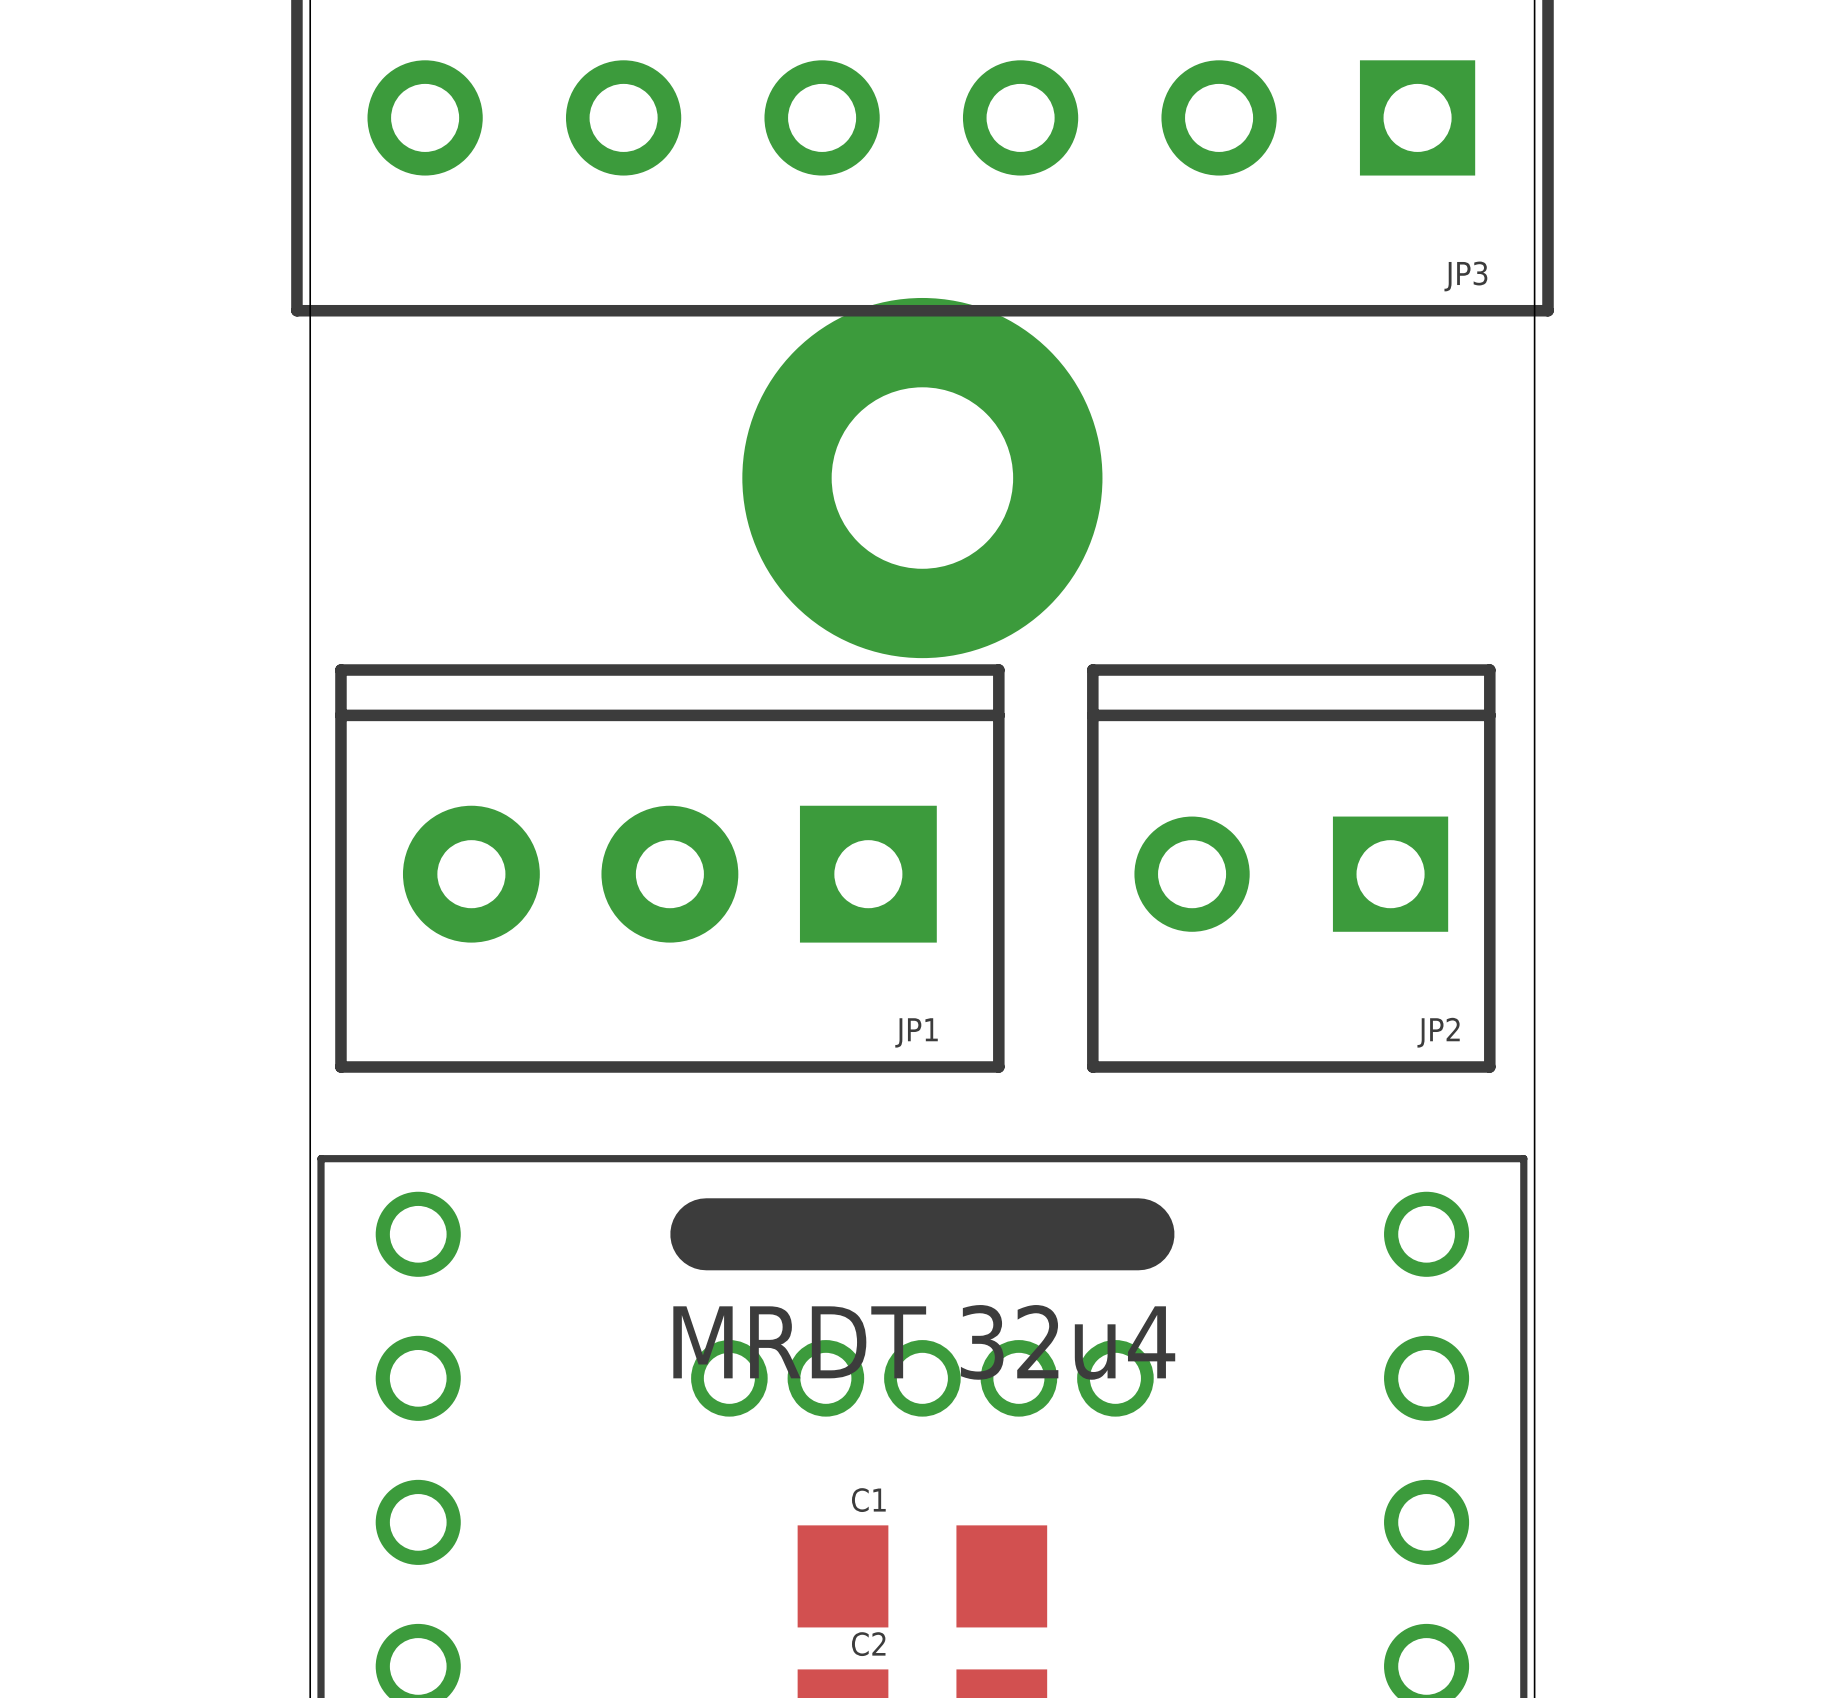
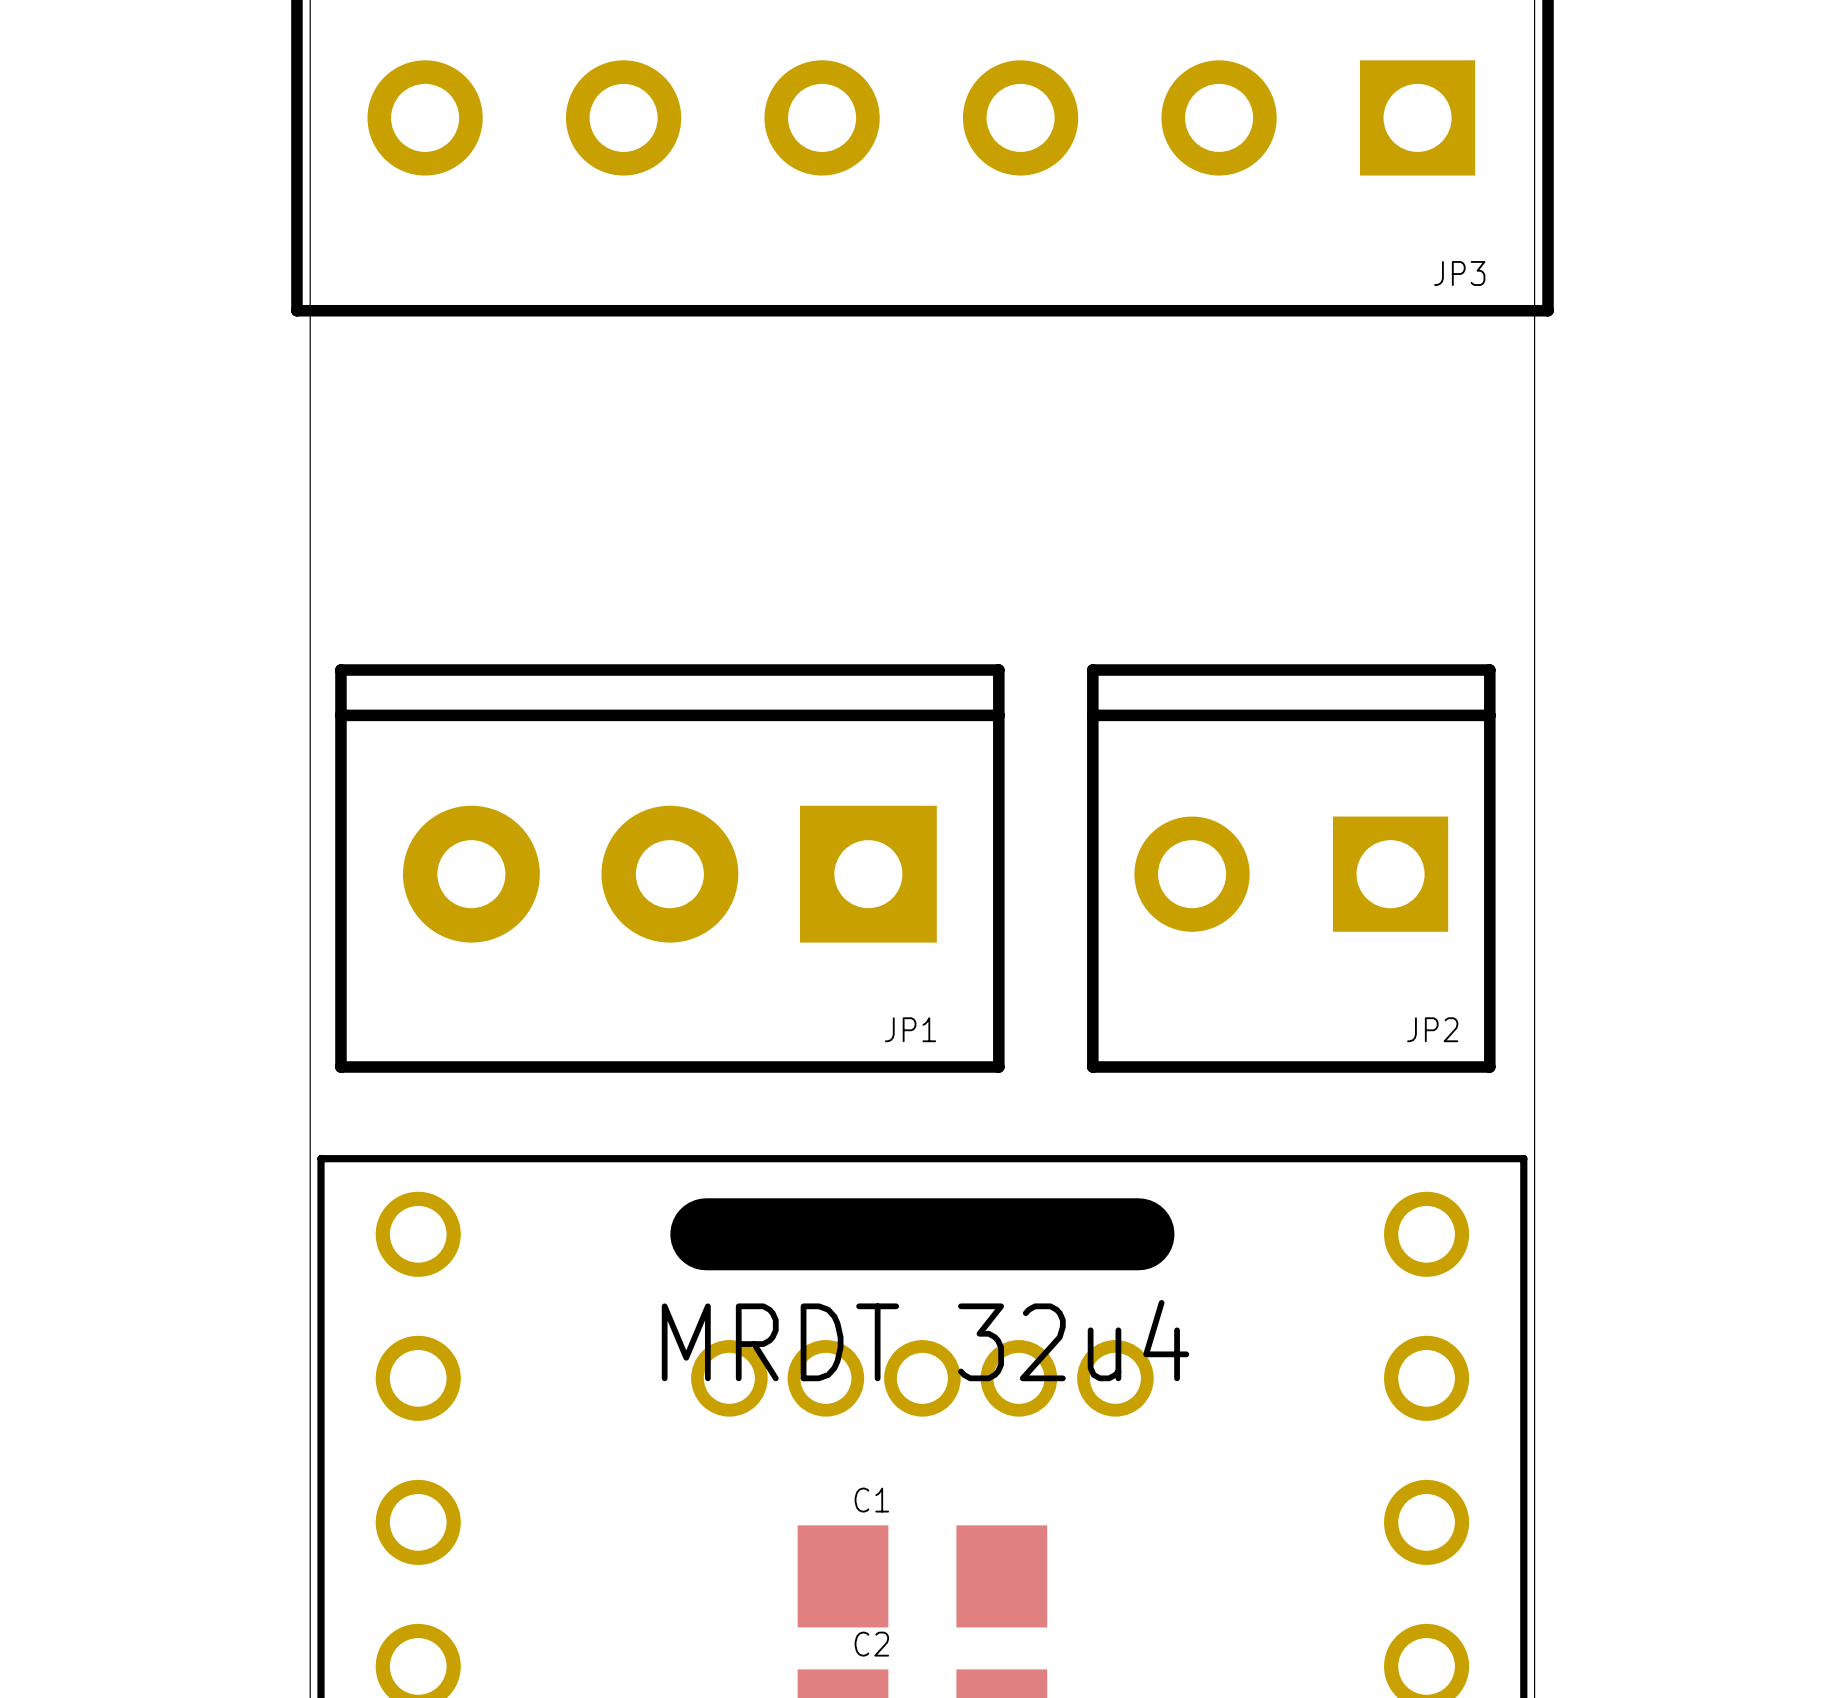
part: (922, 478) -> none

